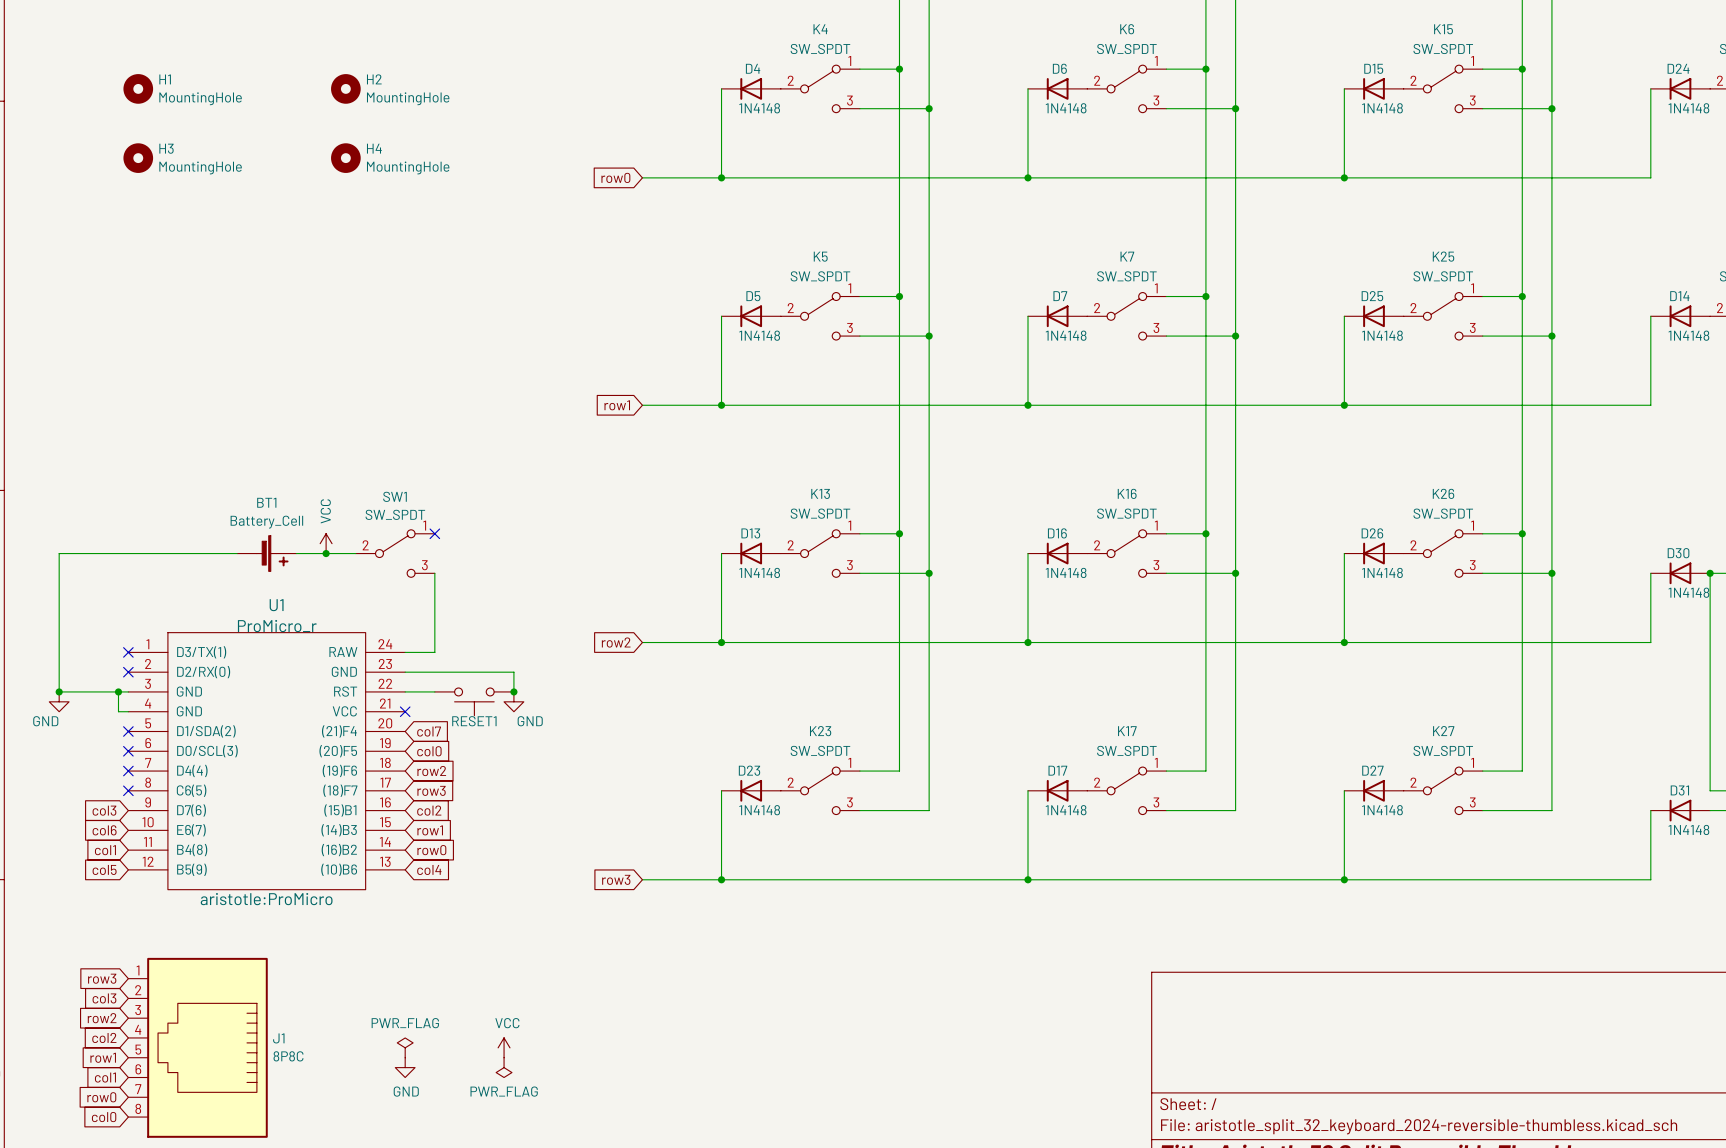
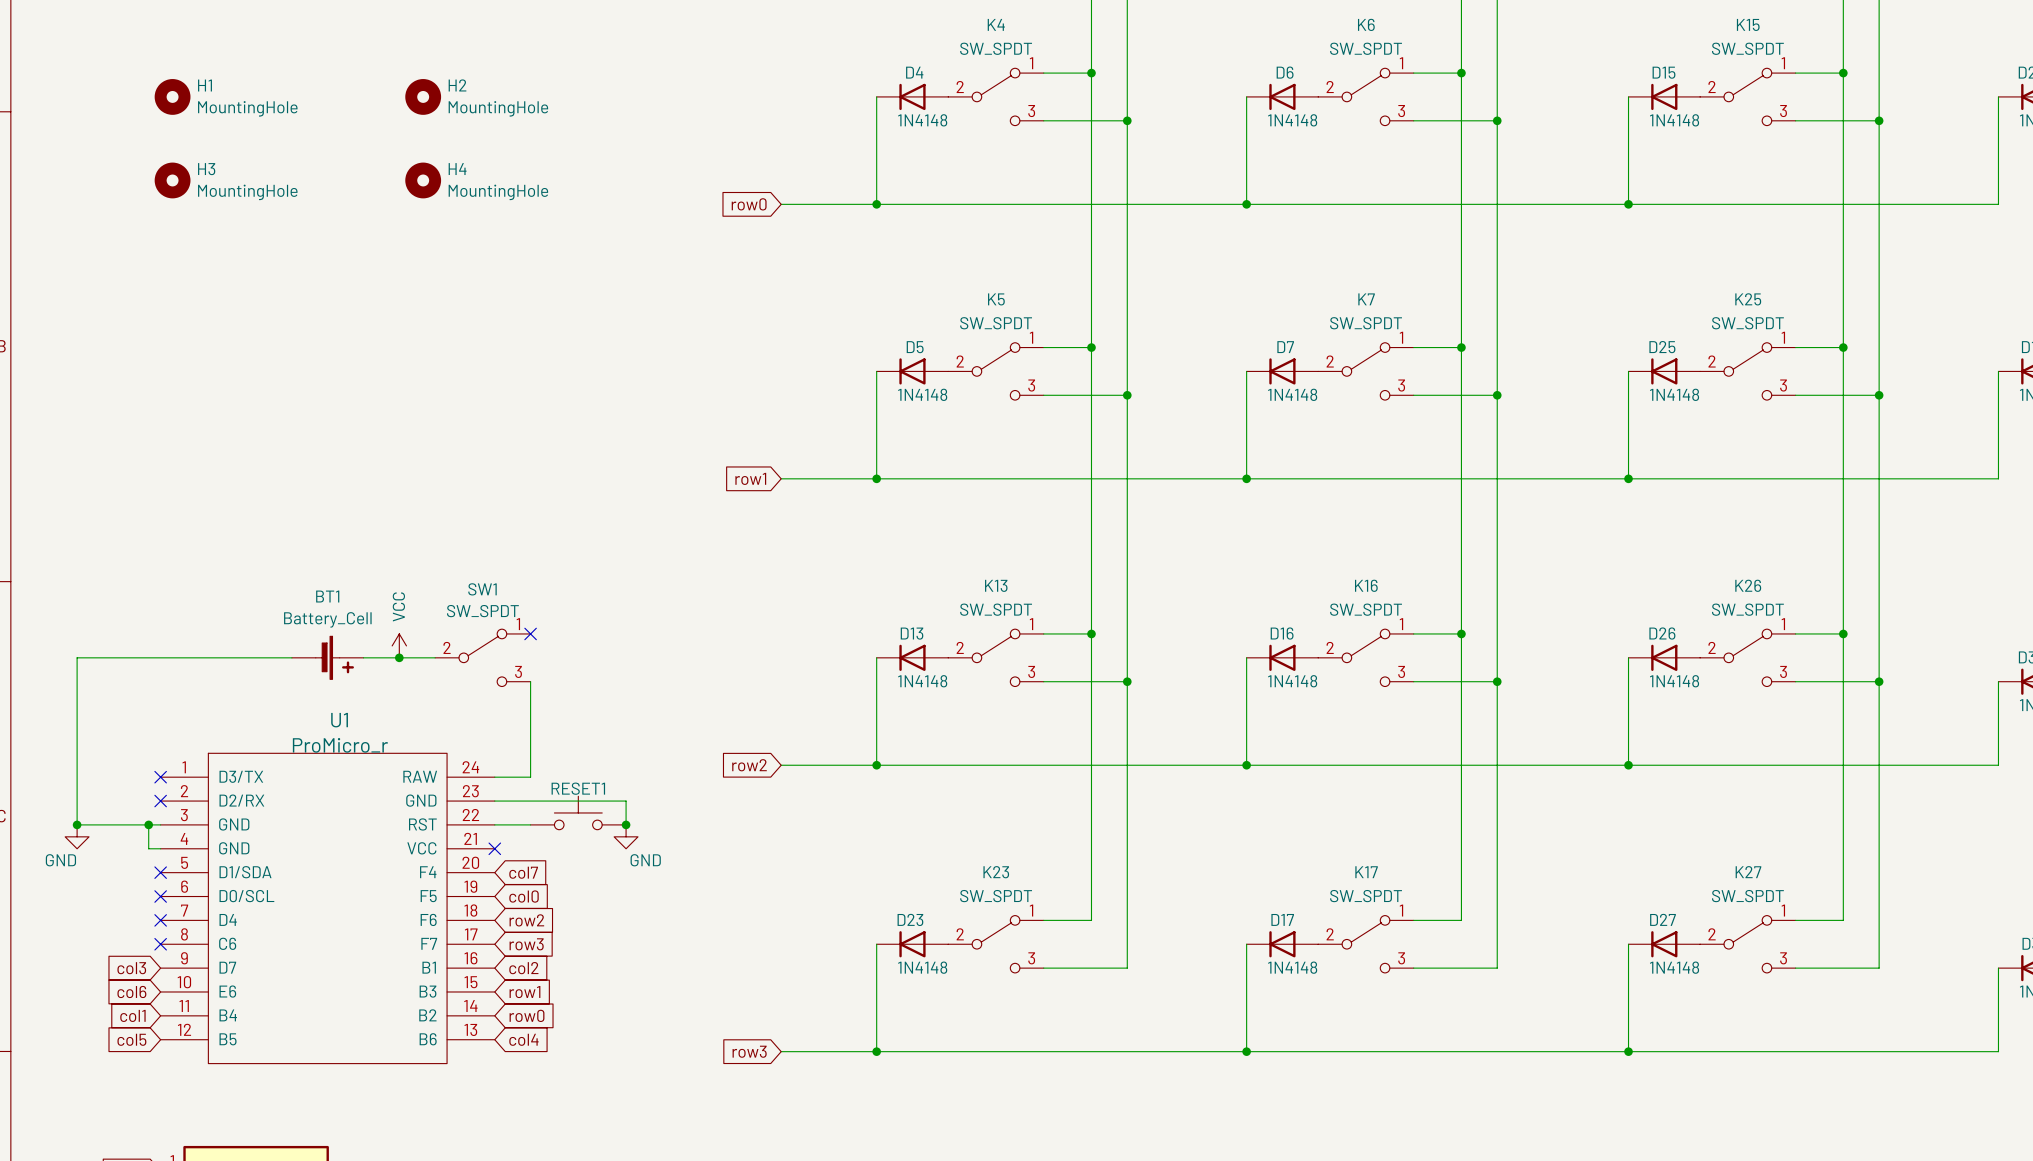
U1 symbol: [128, 632, 406, 890] -> [160, 753, 495, 1064]
RESET1 rotation: 0° (474, 701) -> 180° (578, 812)
U1 text: aristotle:ProMicro (266, 899) -> none

